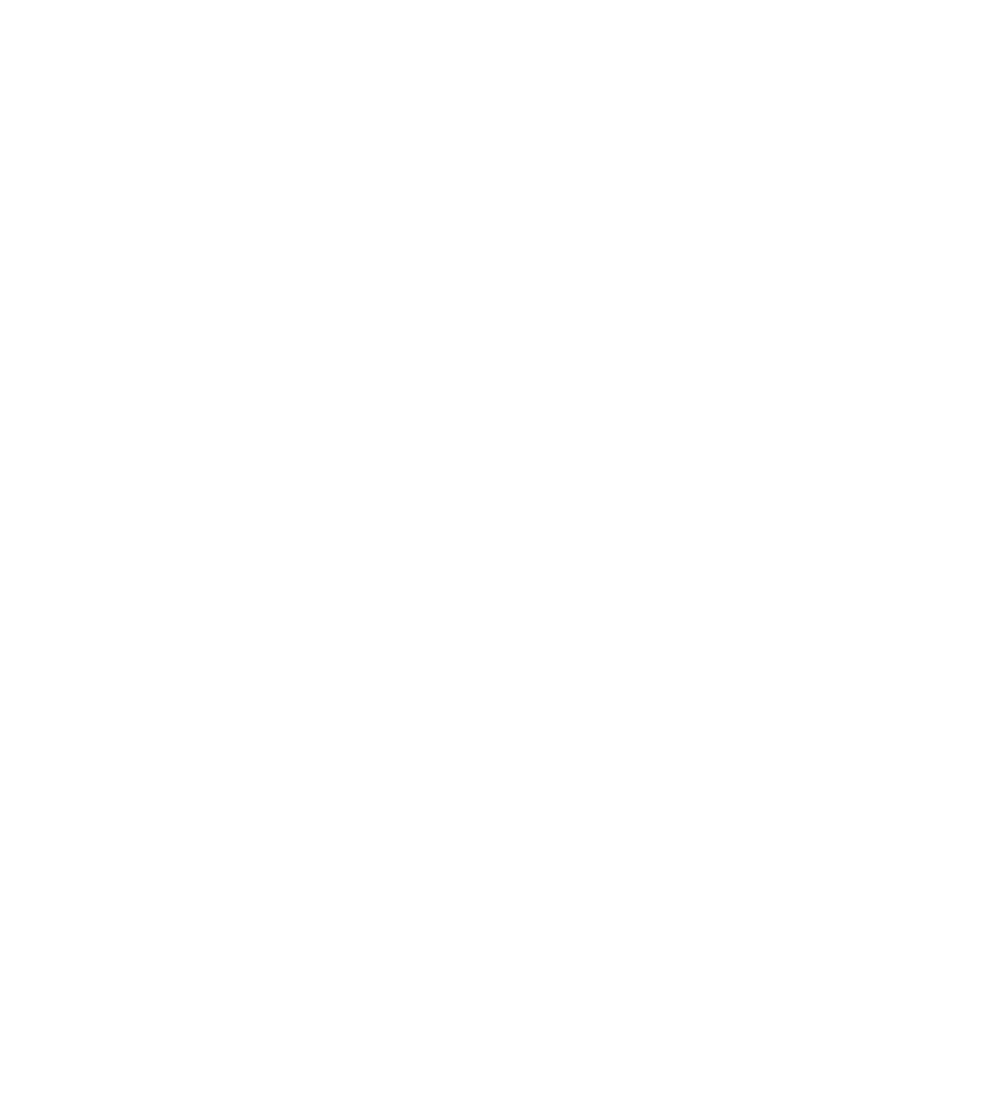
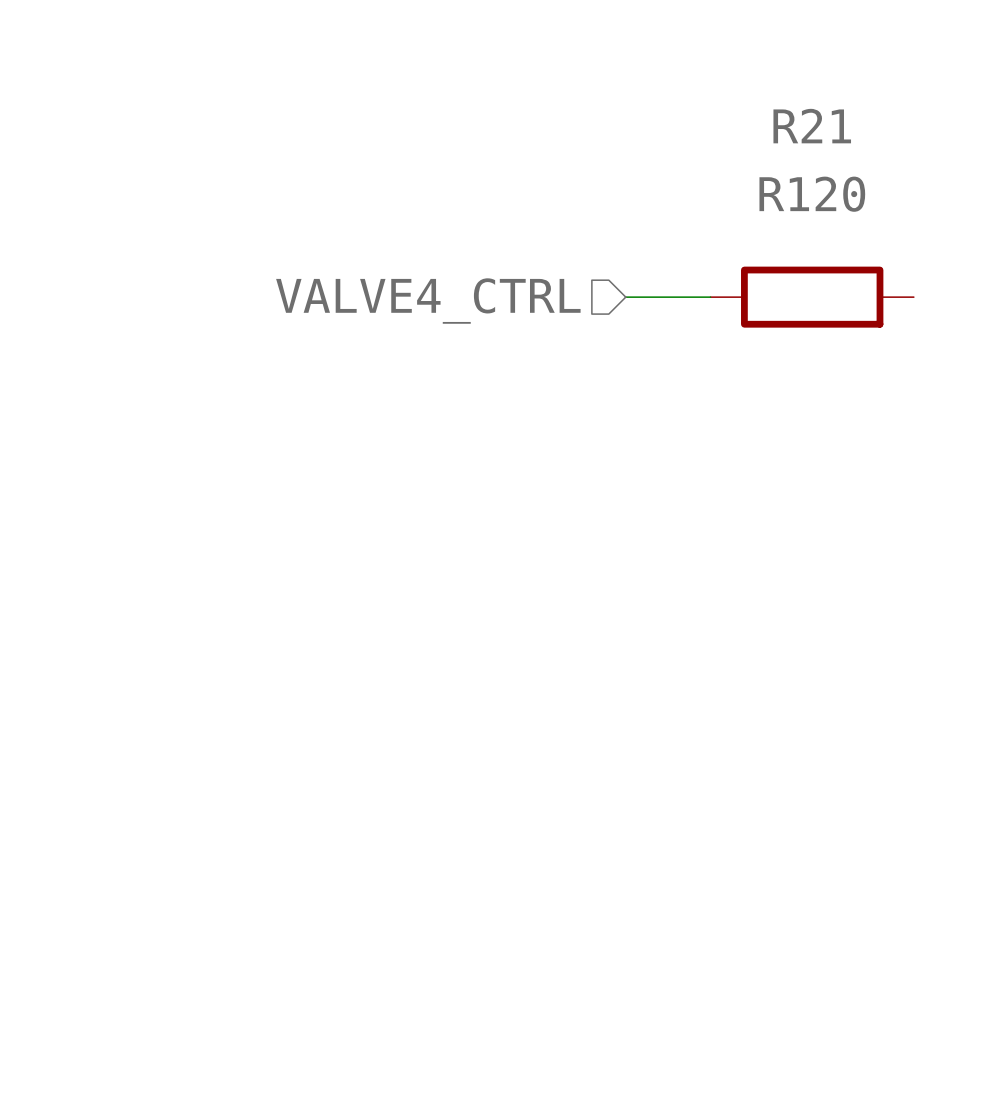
wire: none -> (625, 297) (710, 297)
R21: none -> R120 (812, 297)
hierarchical label: none -> VALVE4_CTRL (428, 301)

